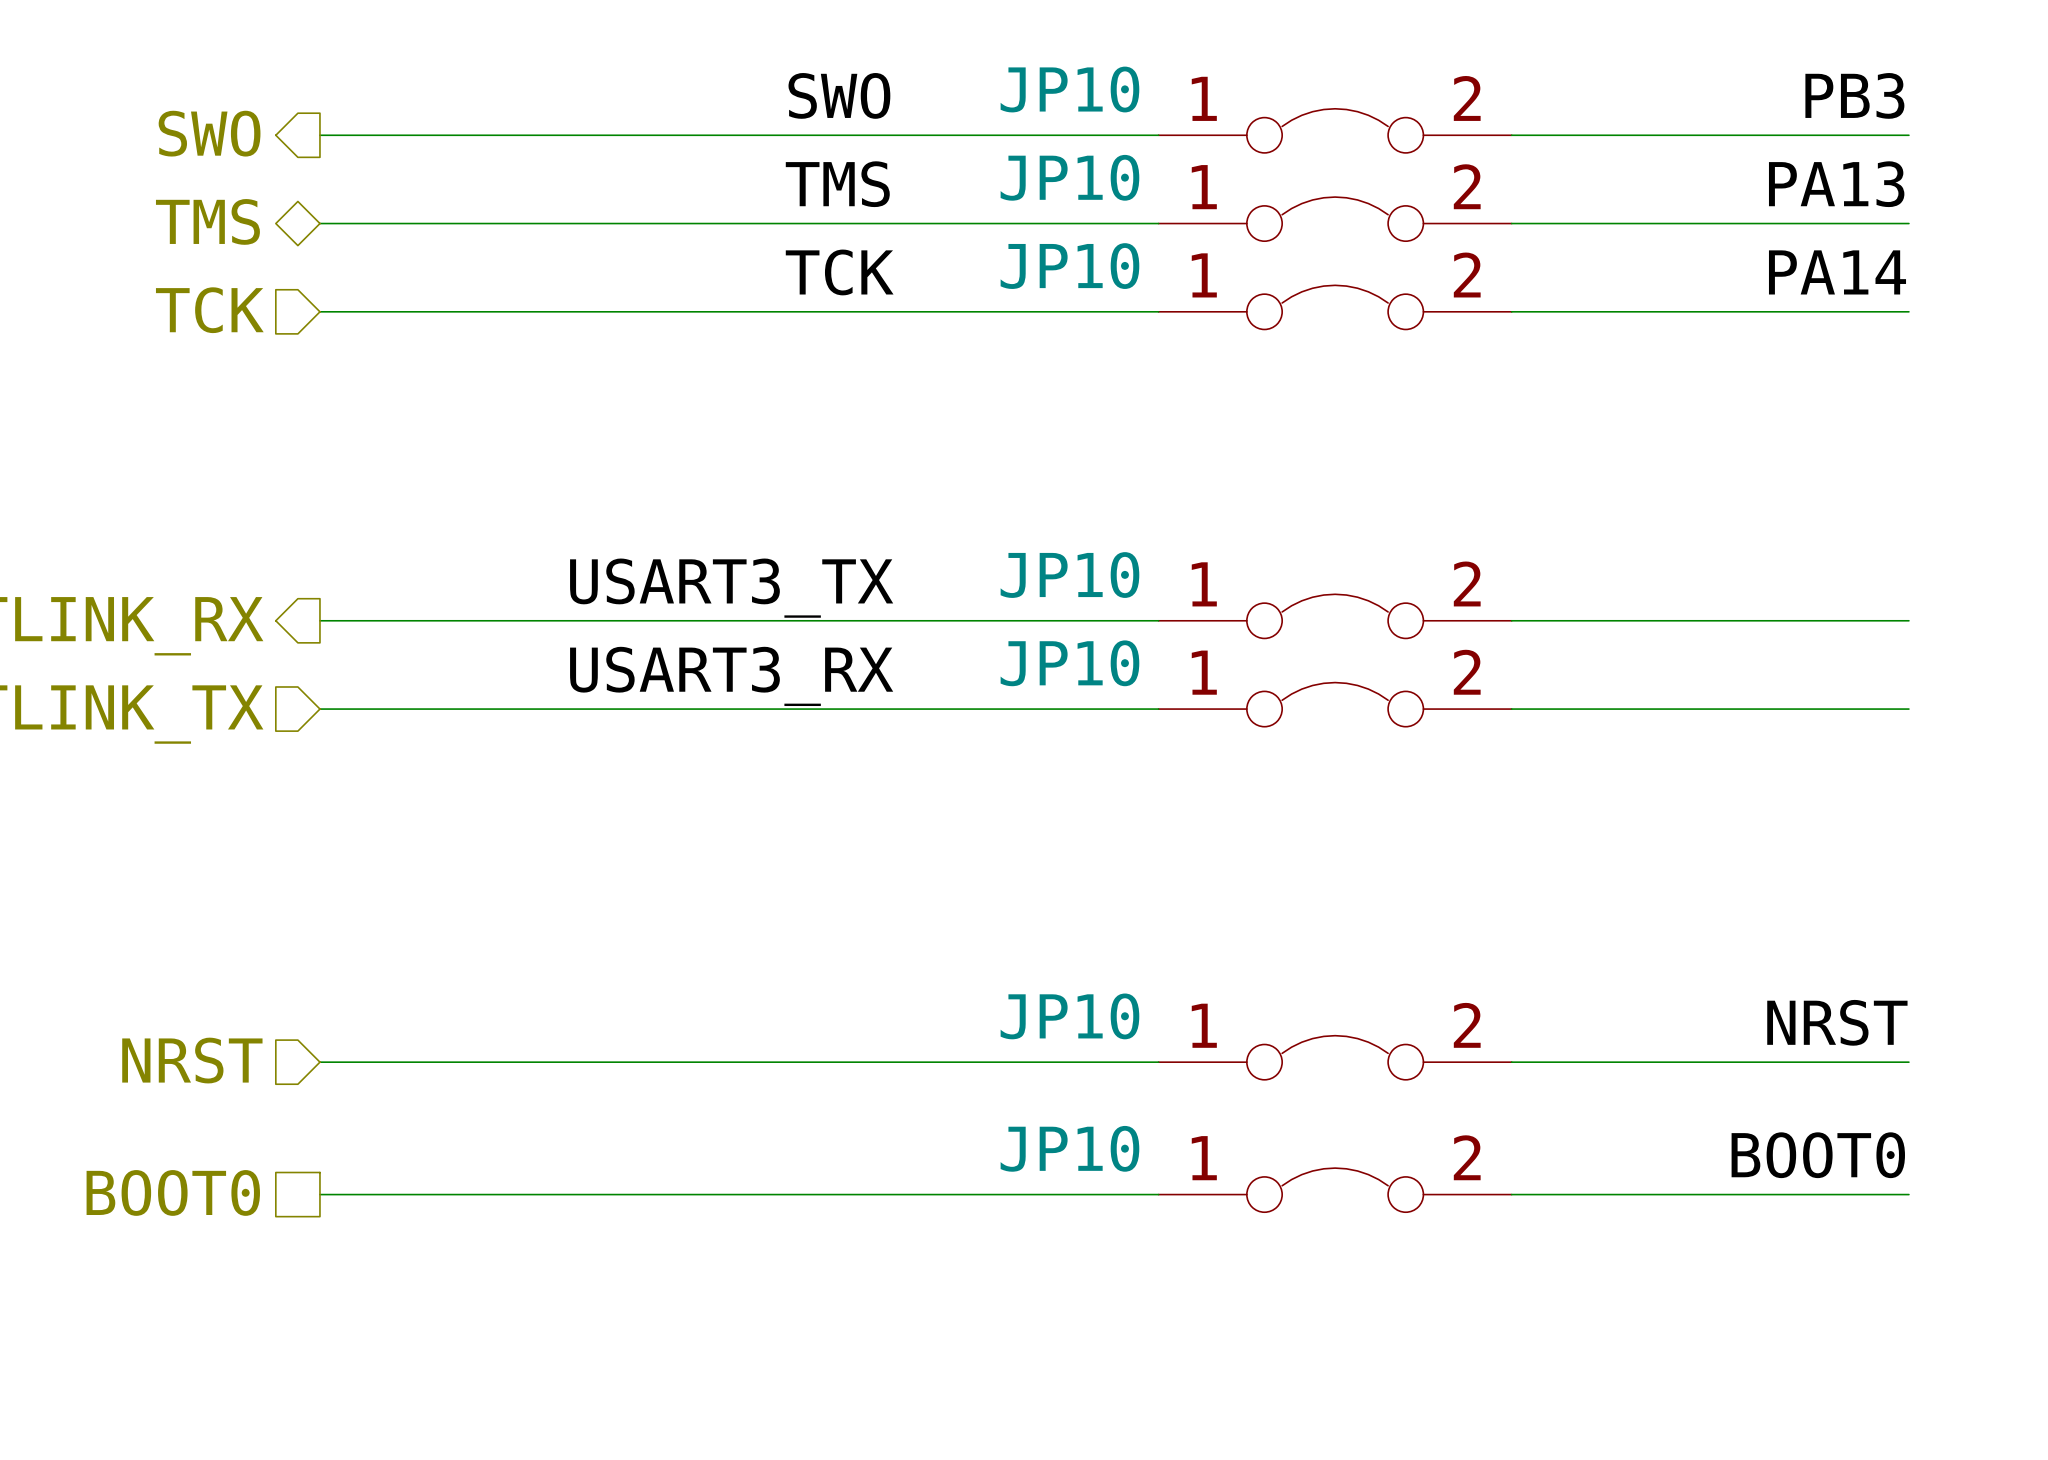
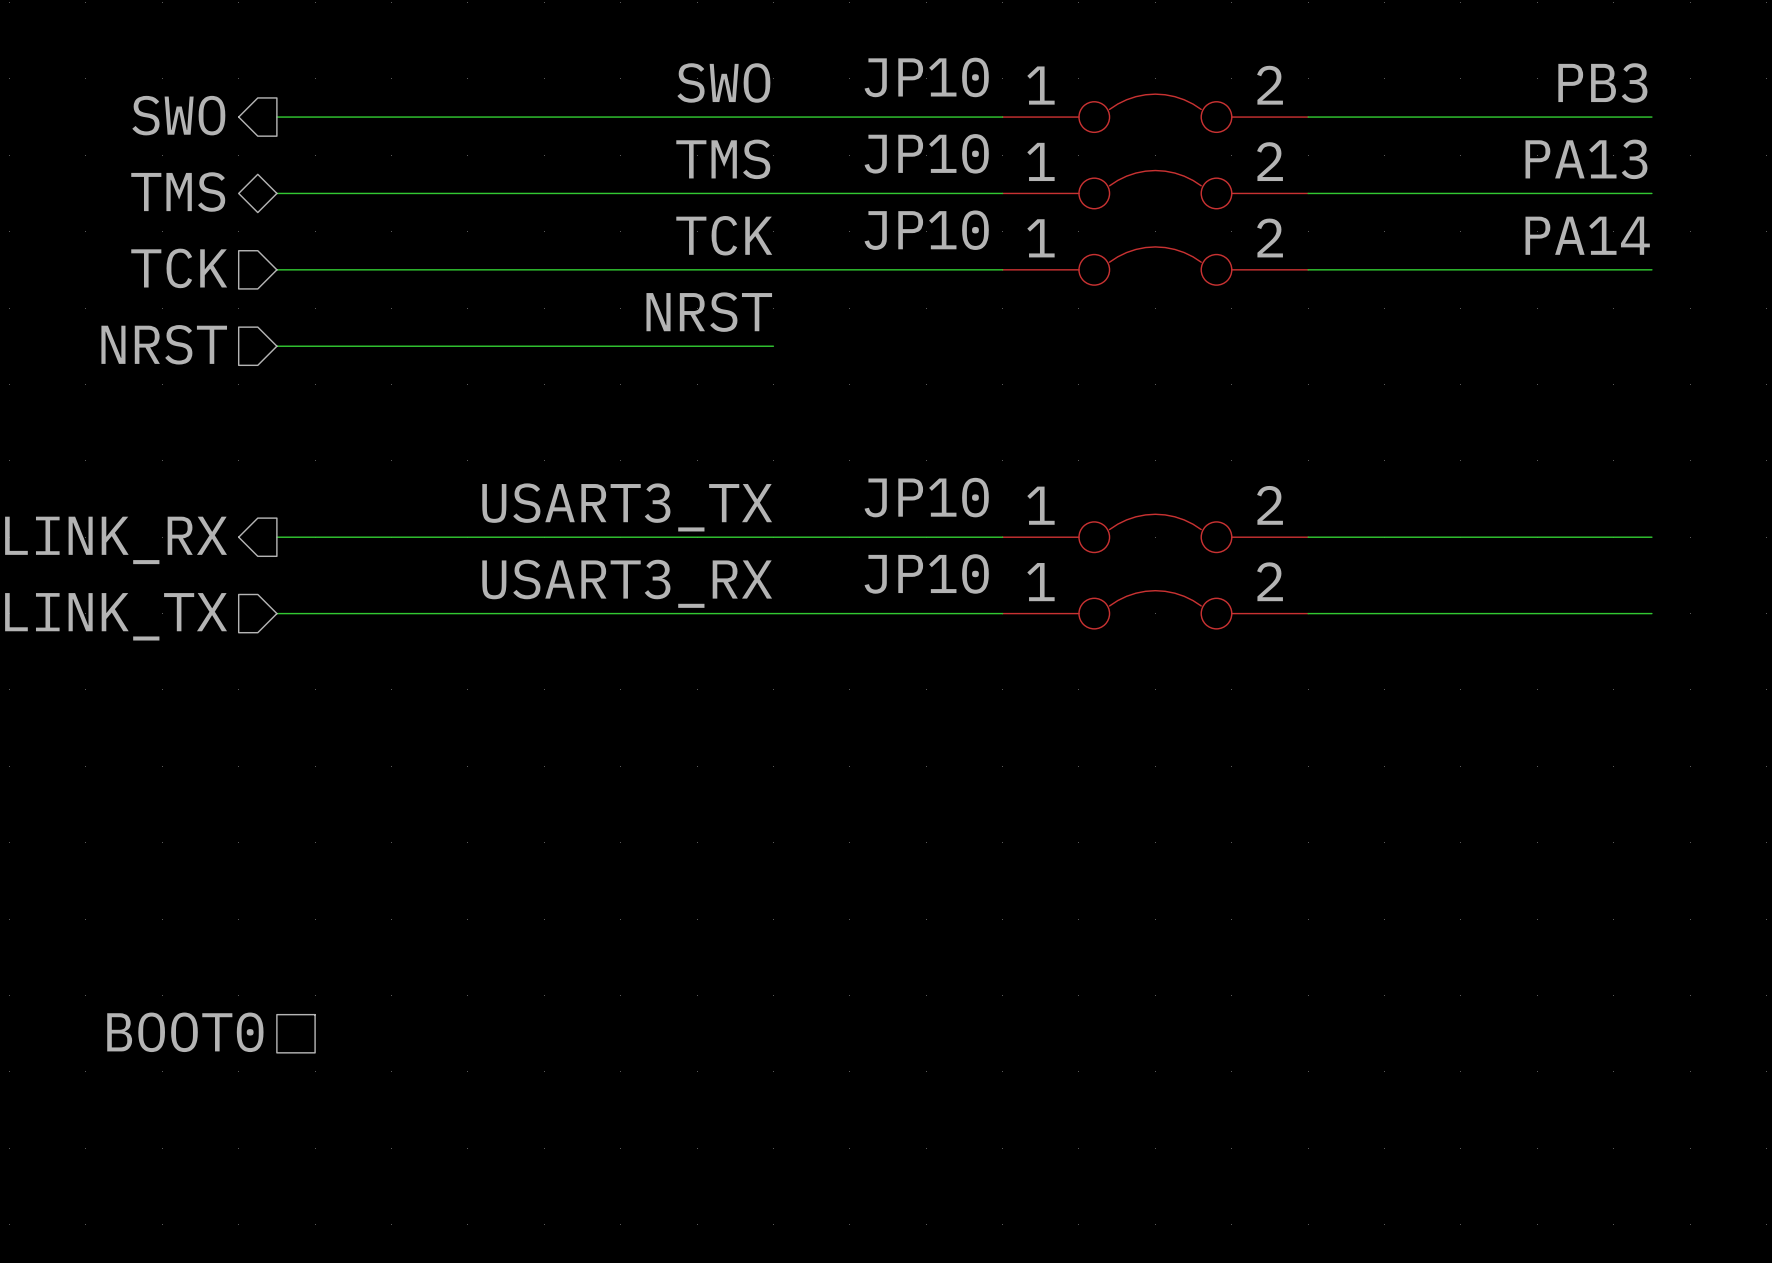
label: none -> NRST (709, 312)
wire: none -> (276, 346) (773, 346)
label: NRST (1837, 1022) -> none
JP10: (1335, 1057) -> none
hierarchical label position: NRST (192, 1060) -> NRST (164, 344)
wire: (319, 1062) (1158, 1062) -> none
wire: (1511, 1062) (1908, 1062) -> none
label: BOOT0 (1818, 1155) -> none
JP10: (1335, 1190) -> none
hierarchical label position: BOOT0 (173, 1192) -> BOOT0 (185, 1032)
wire: (319, 1194) (1158, 1194) -> none
wire: (1511, 1194) (1908, 1194) -> none

